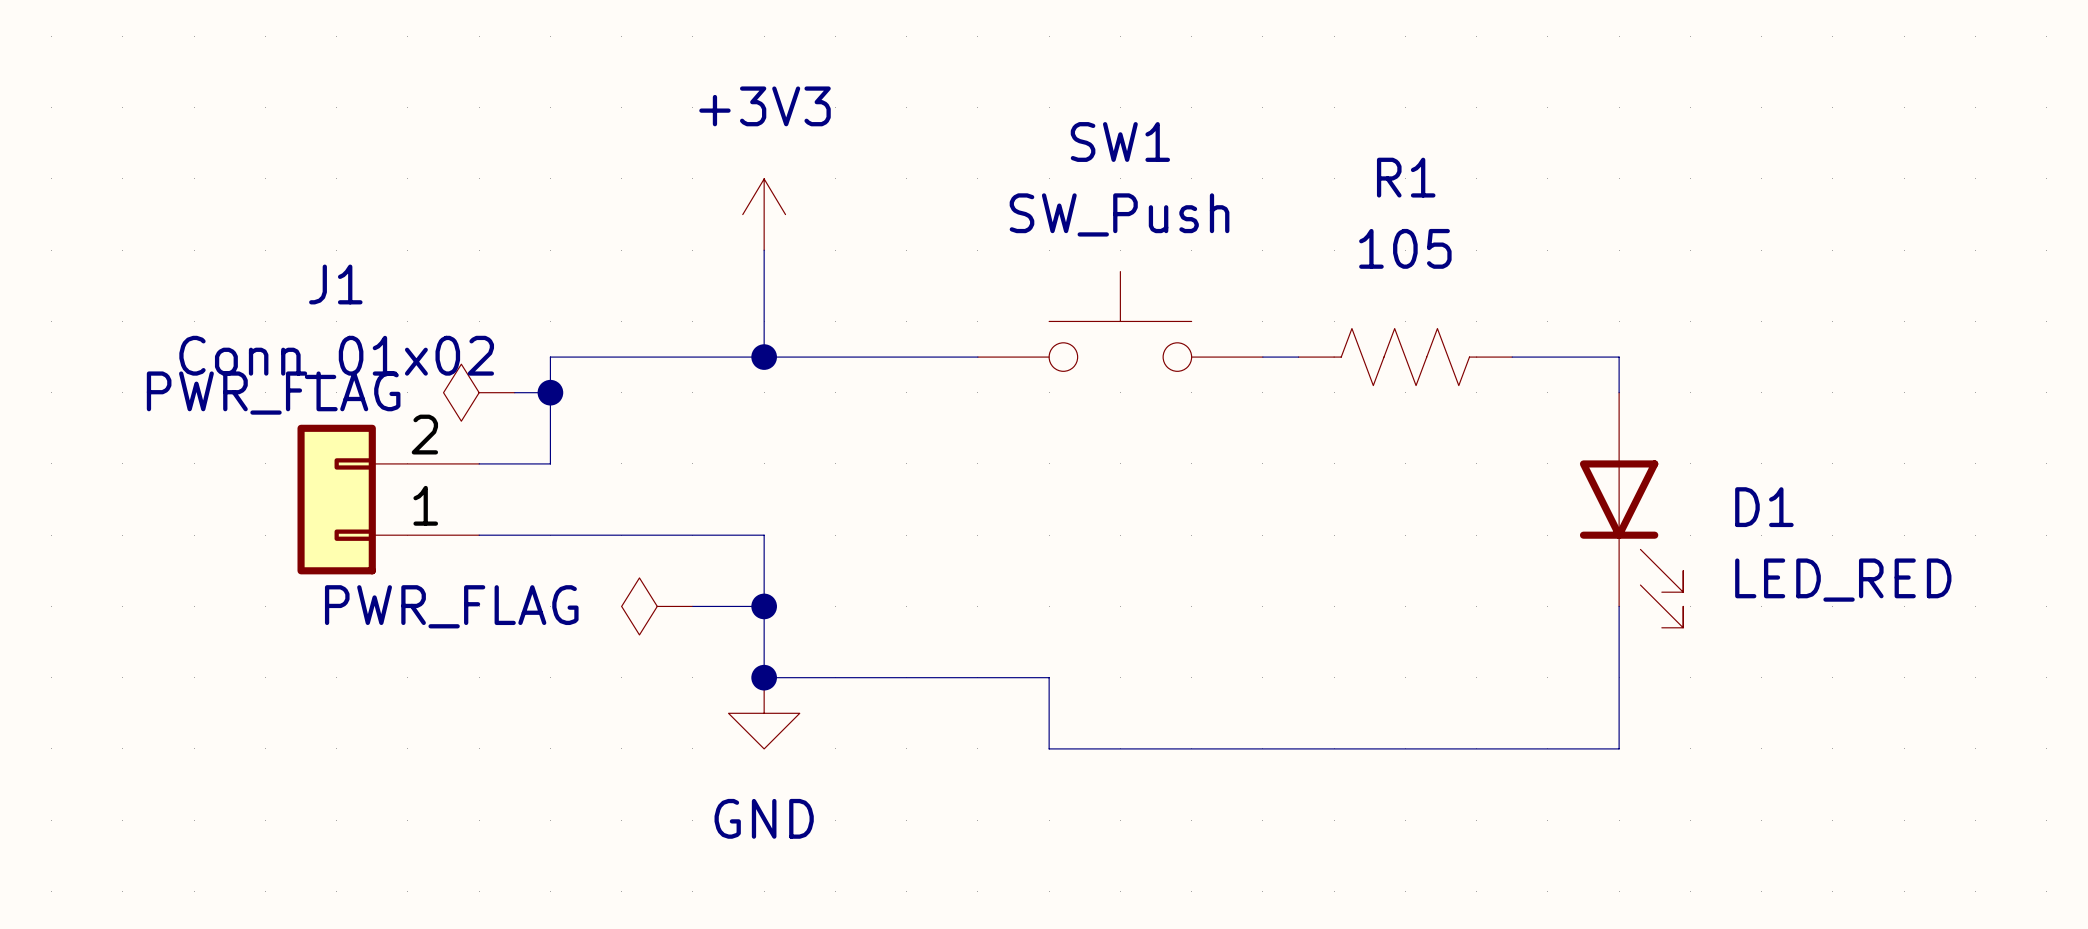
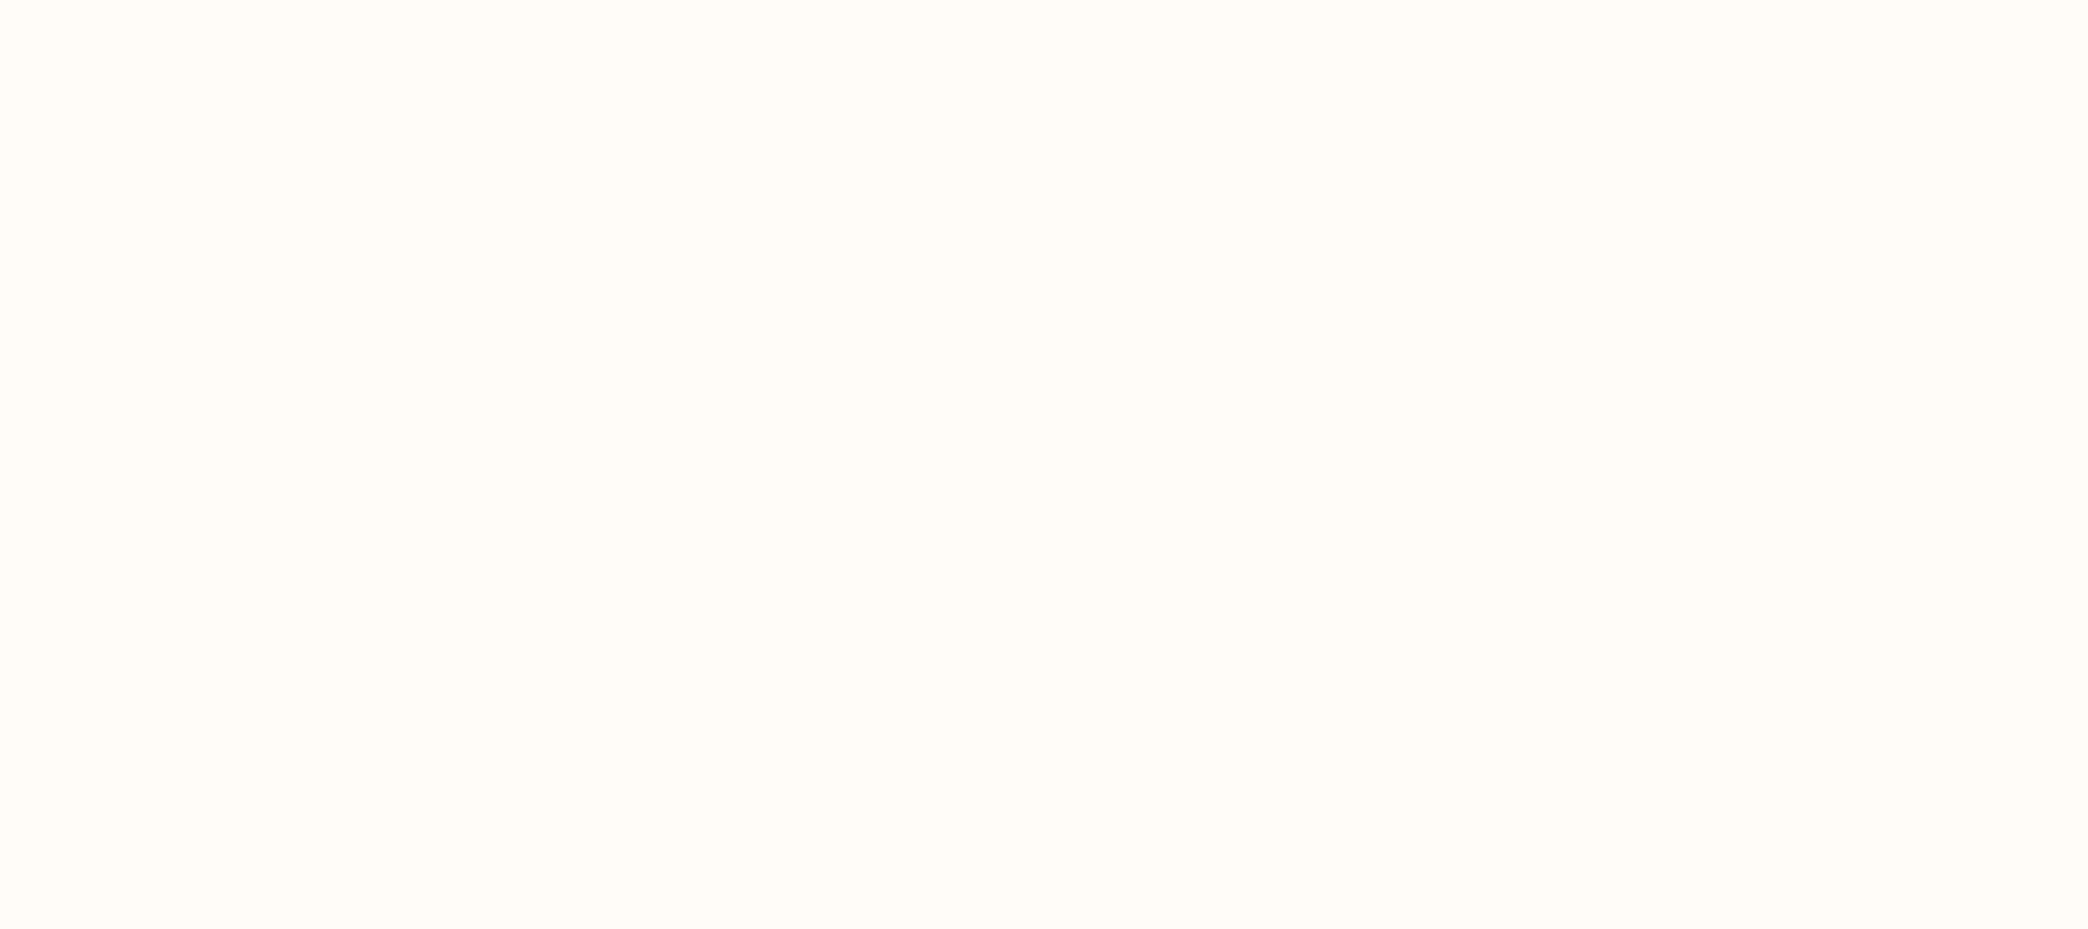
power symbol: +3V3 (764, 214) -> none
wire: (764, 250) (764, 357) -> none
SW1: SW_Push (1120, 321) -> none
junction: (764, 357) -> none
wire: (977, 357) (550, 357) (550, 463) (479, 463) -> none
wire: (1262, 357) (1298, 357) -> none
R1: 105 (1405, 357) -> none
wire: (1512, 357) (1619, 357) (1619, 392) -> none
power symbol: PWR_FLAG (479, 392) -> none
wire: (514, 392) (550, 392) -> none
junction: (550, 392) -> none
J1: Conn_01x02 (388, 499) -> none
D1: LED_RED (1631, 510) -> none
wire: (479, 535) (764, 535) (764, 677) (1049, 677) (1049, 748) (1619, 748) (1619, 606) -> none
power symbol: PWR_FLAG (657, 606) -> none
wire: (692, 606) (764, 606) -> none
junction: (764, 606) -> none
junction: (764, 677) -> none
power symbol: GND (764, 713) -> none

